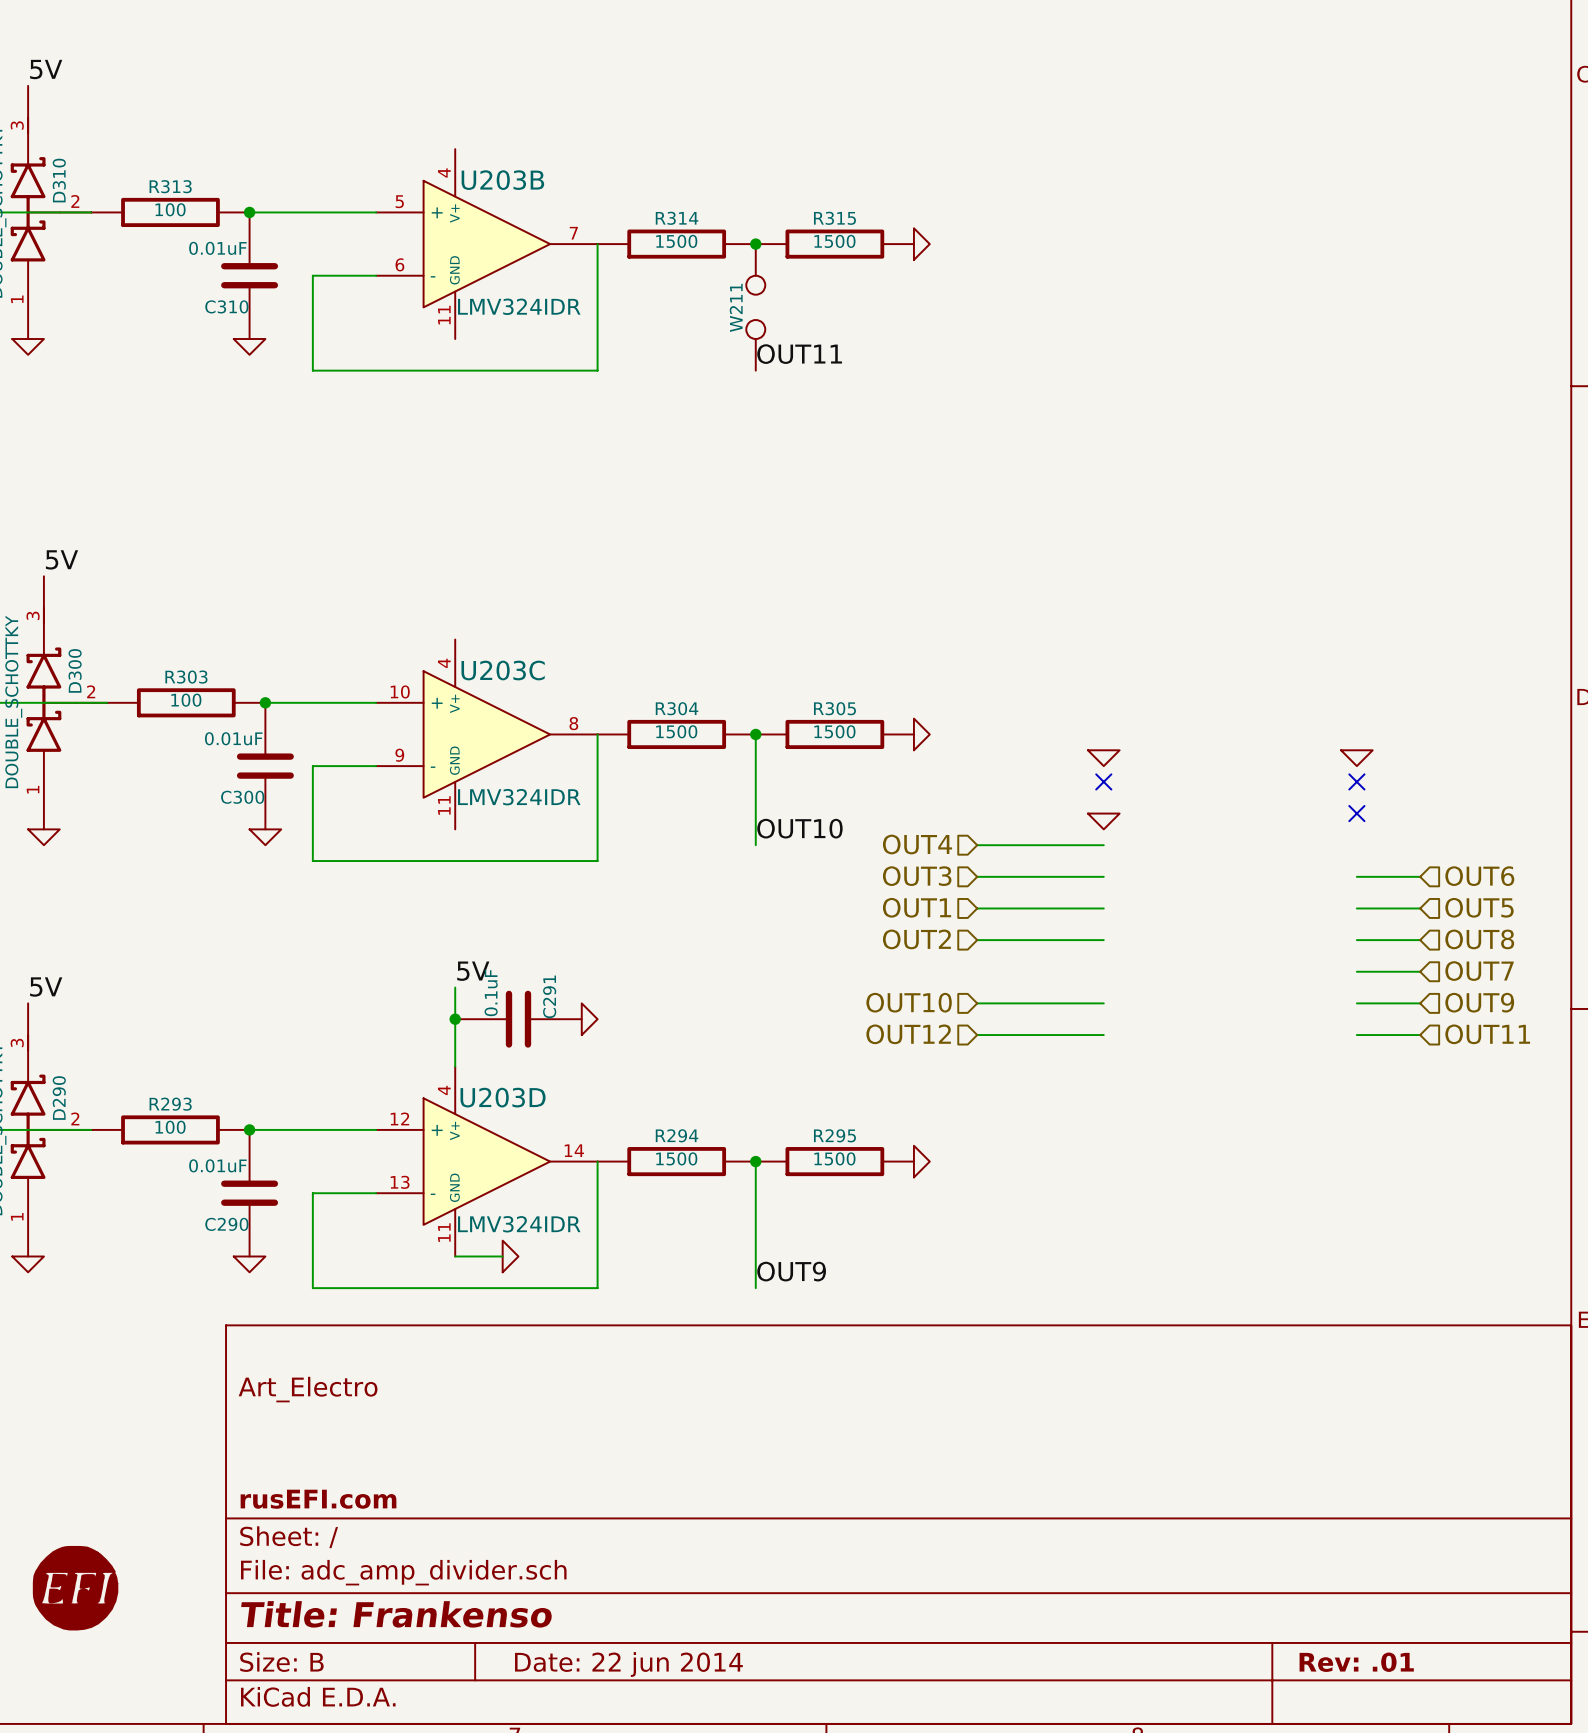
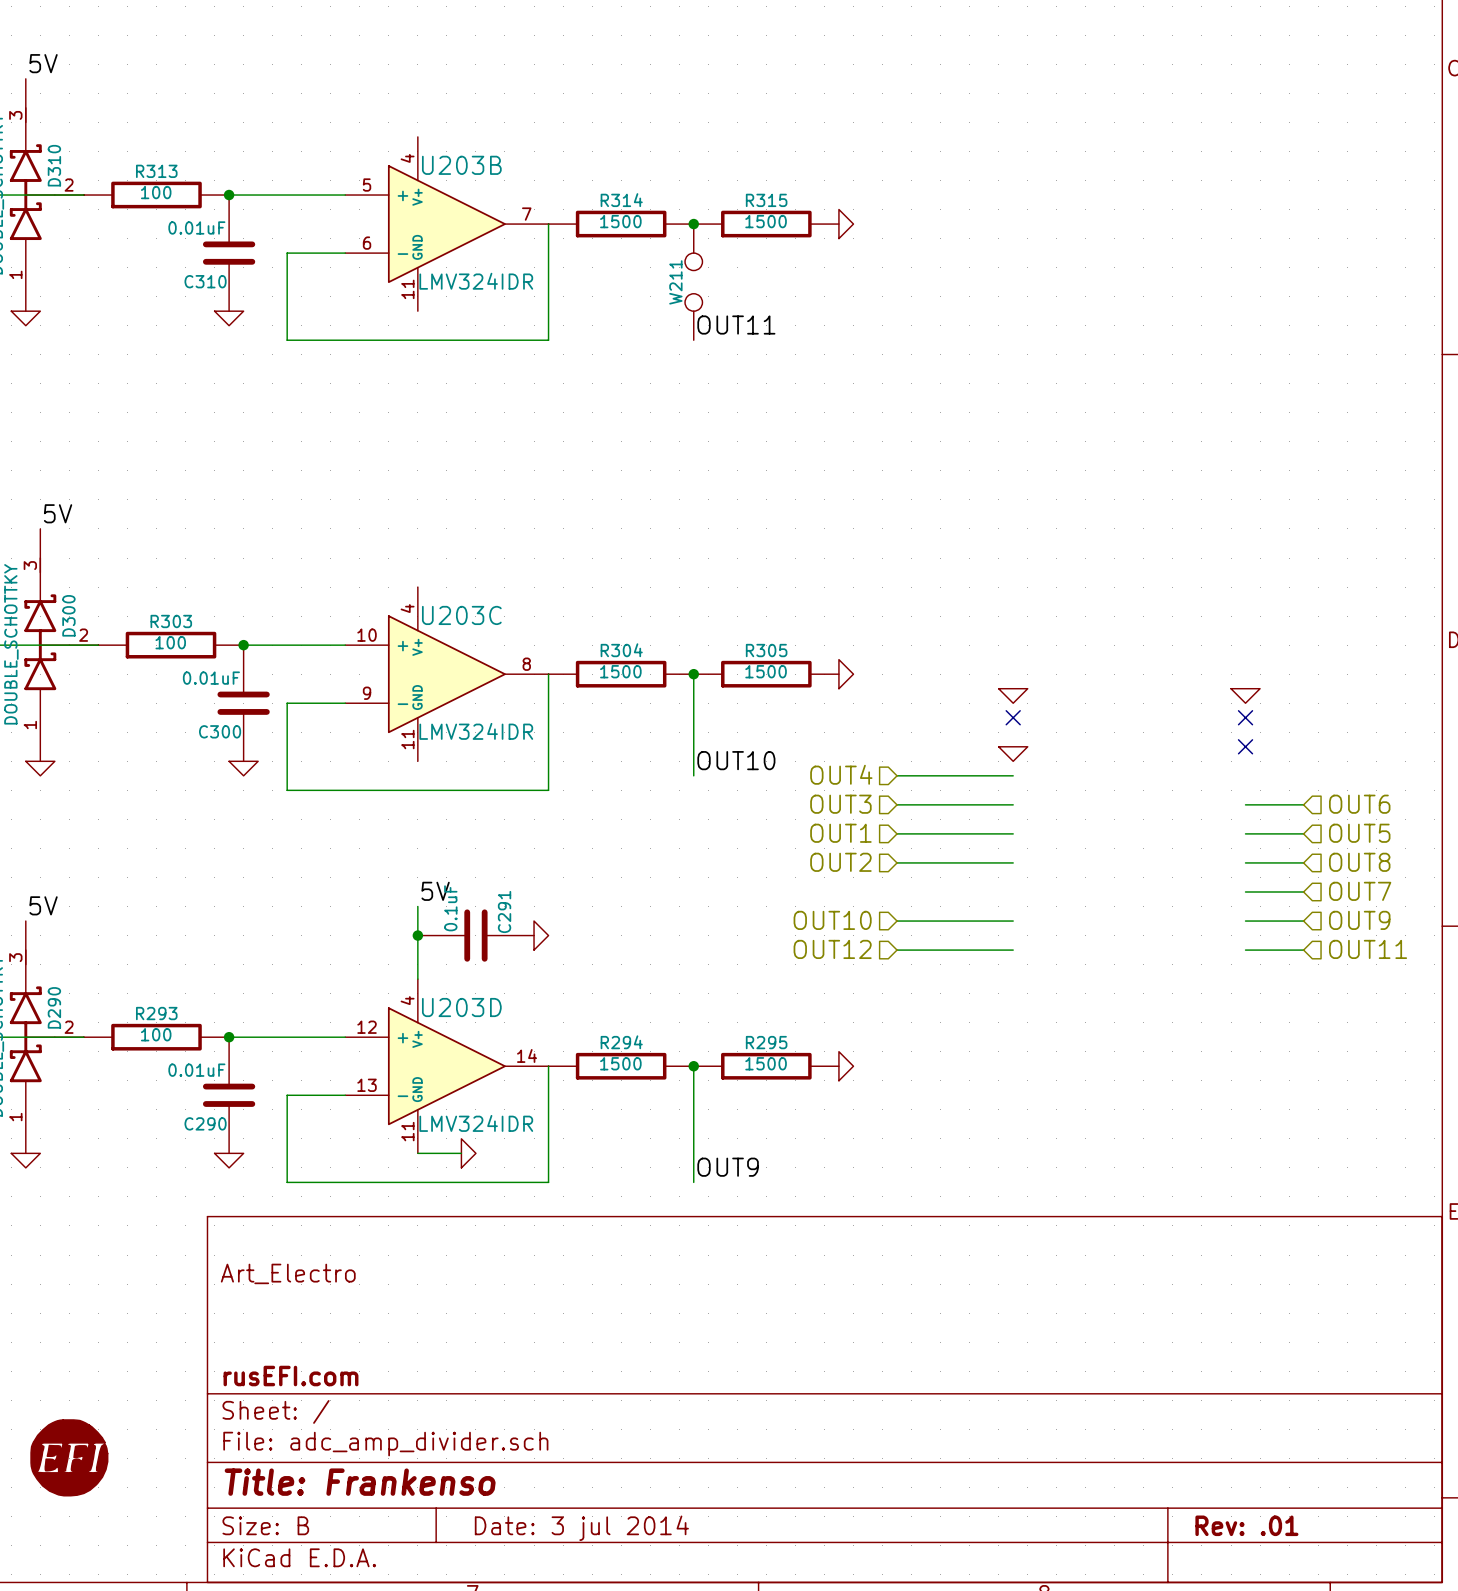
title block: Date: 22 jun 2014 (628, 1664) -> Date: 3 jul 2014 (581, 1528)

